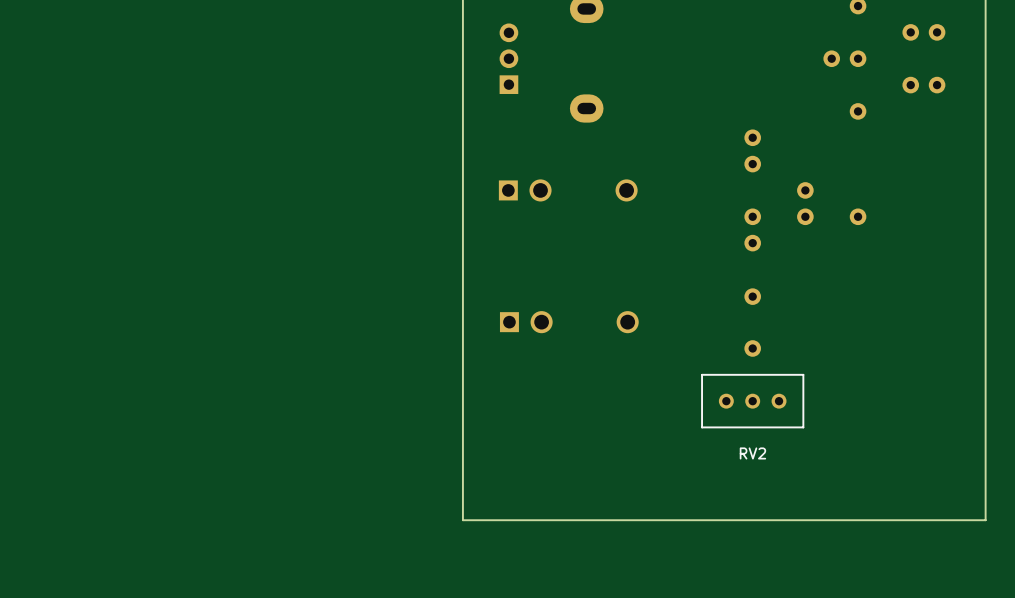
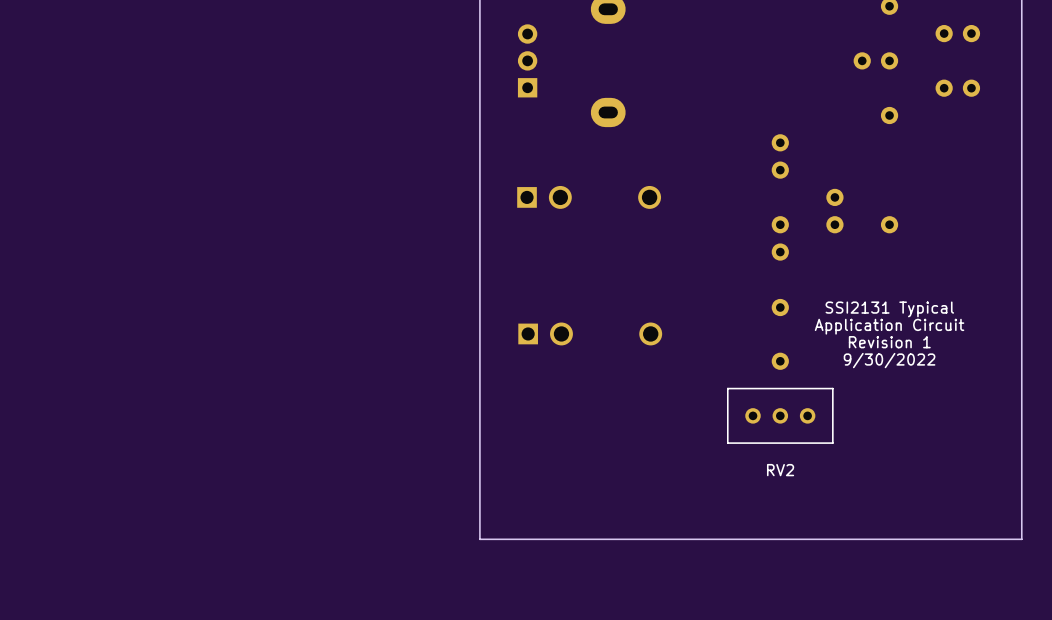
text: none -> SSI2131 Typical (889, 309)
text: none -> Application Circuit (889, 326)
text: none -> Revision 1 (889, 342)
text: none -> 9/30/2022 (889, 360)

